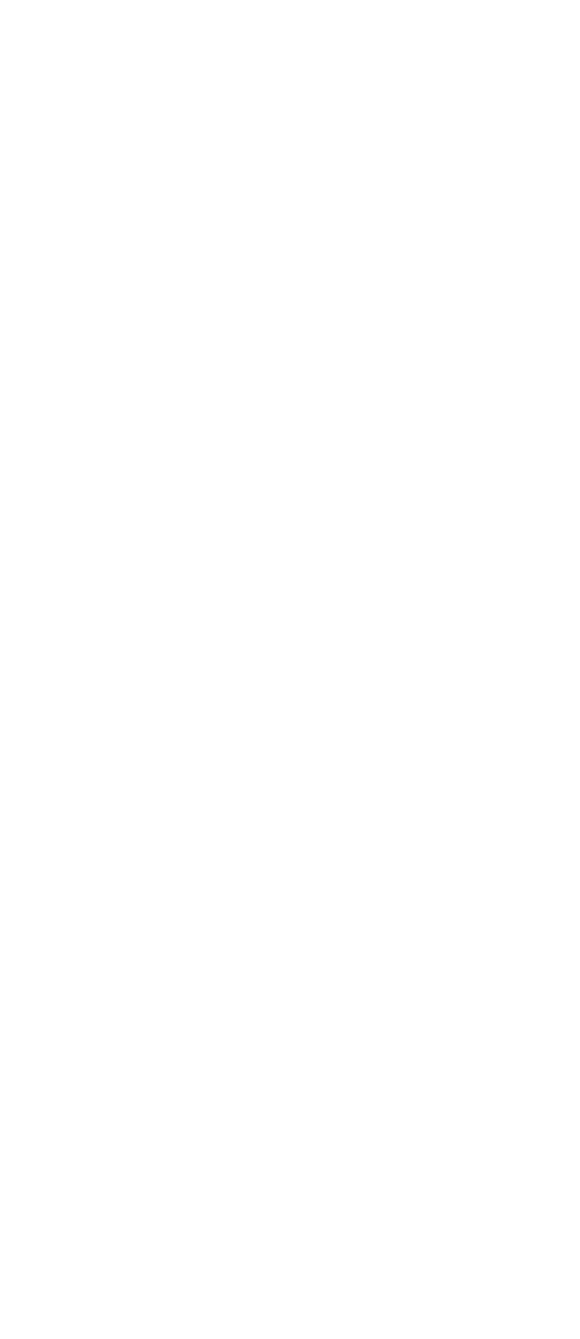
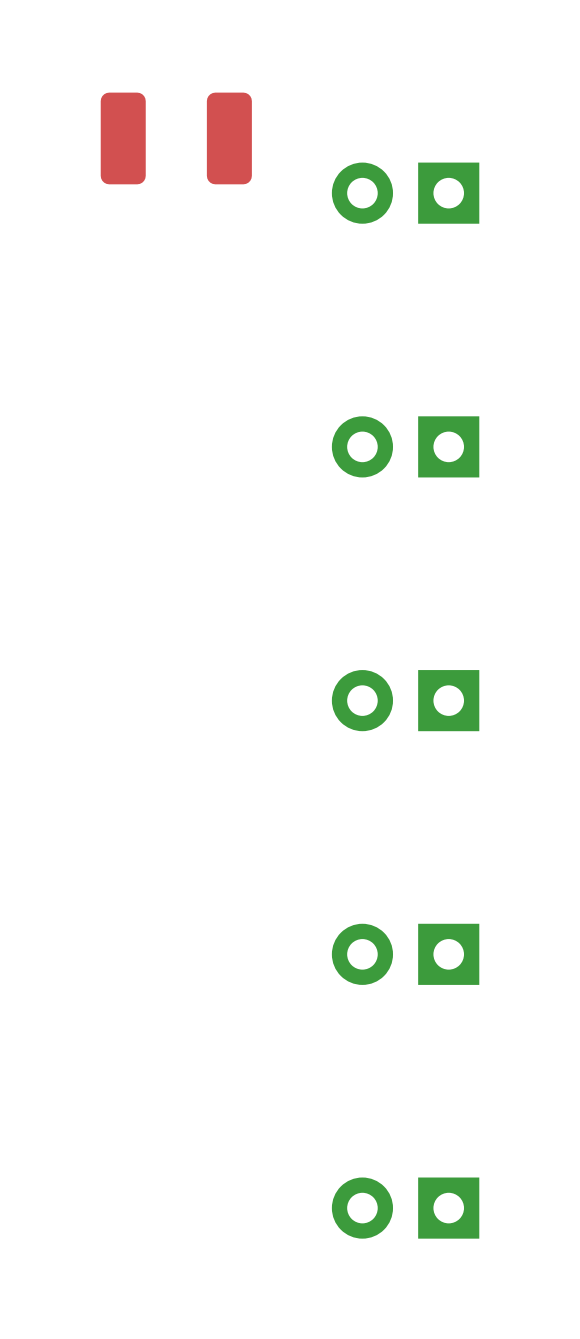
part: none -> (176, 138)
part: none -> (405, 193)
part: none -> (405, 446)
part: none -> (405, 700)
part: none -> (405, 954)
part: none -> (405, 1208)

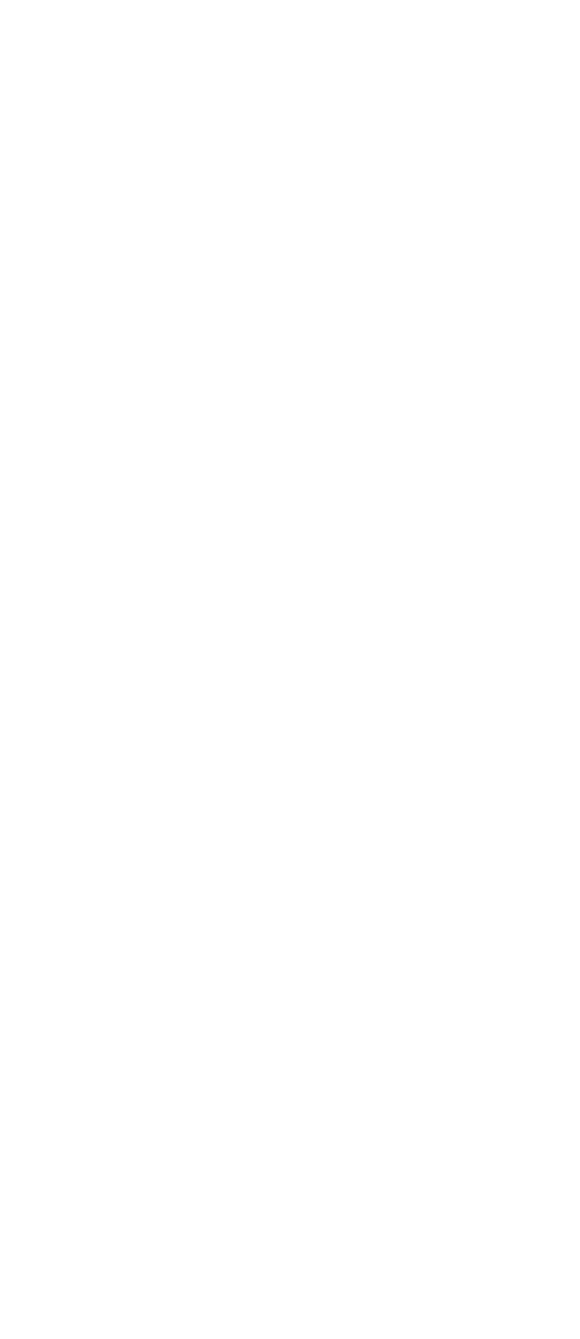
part: (176, 138) -> none
part: (405, 193) -> none
part: (405, 446) -> none
part: (405, 700) -> none
part: (405, 954) -> none
part: (405, 1208) -> none

